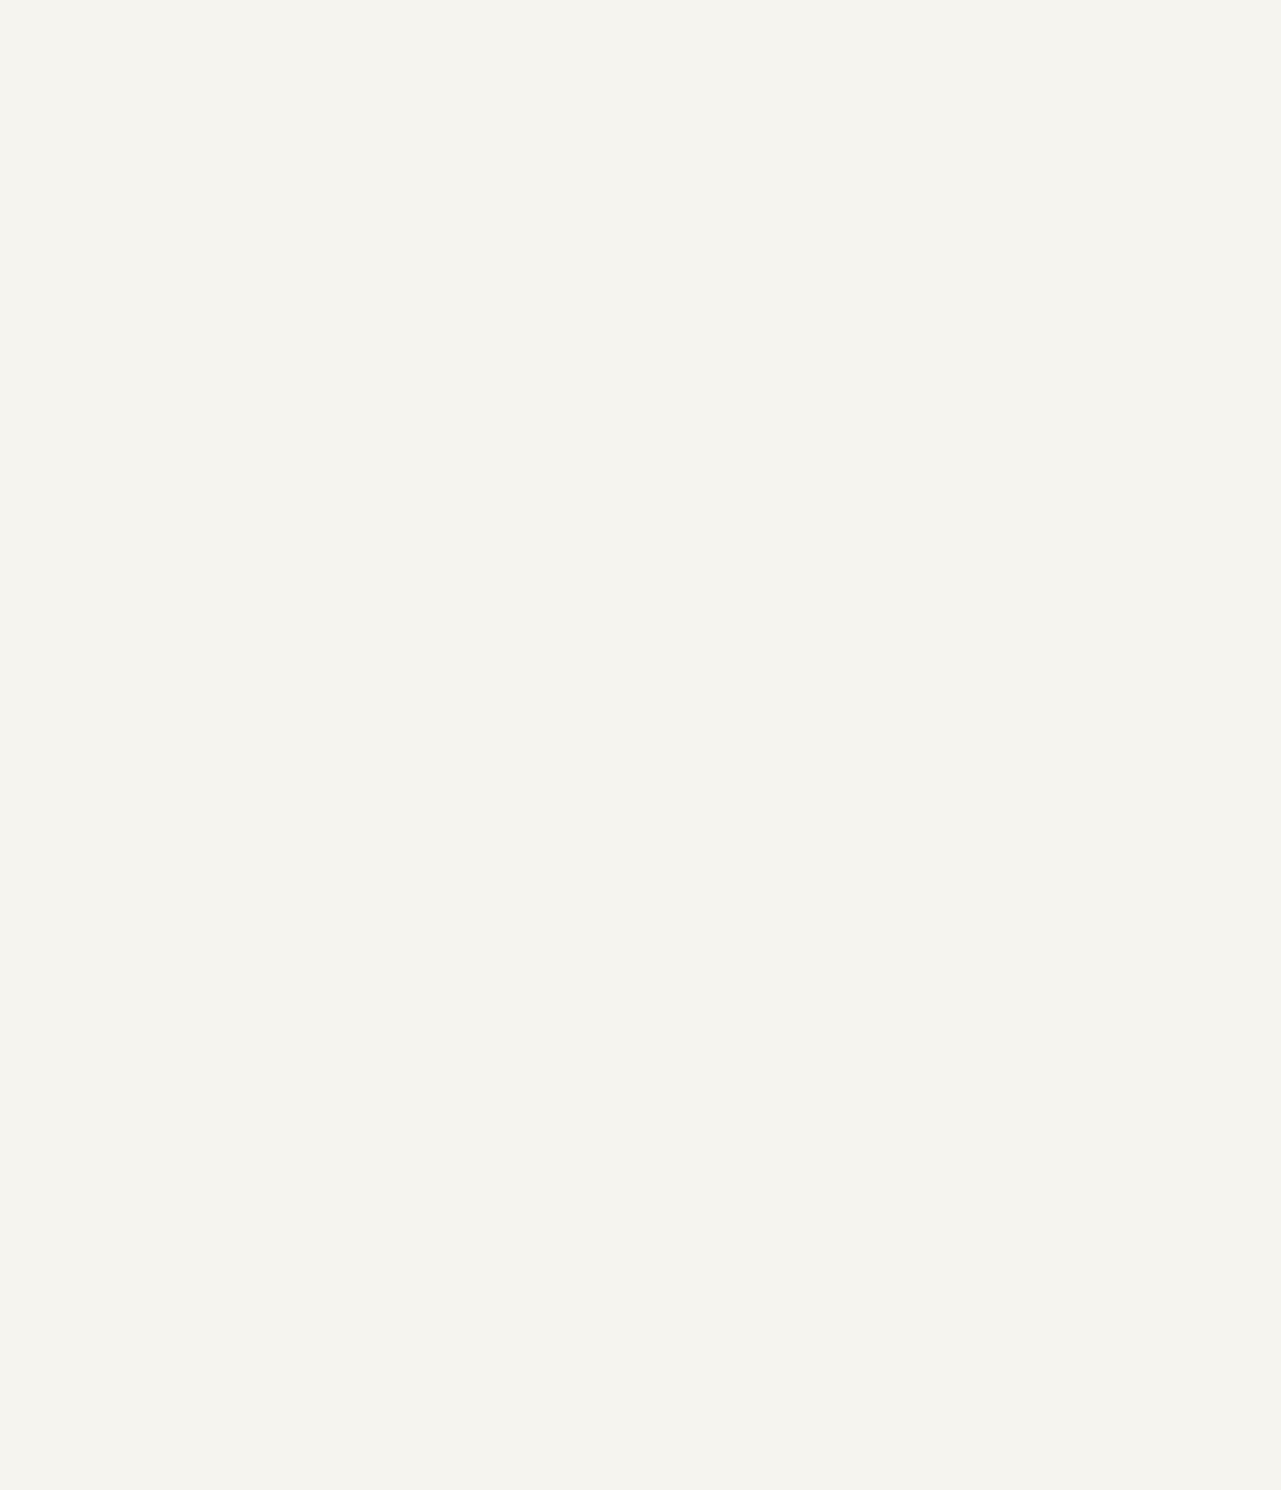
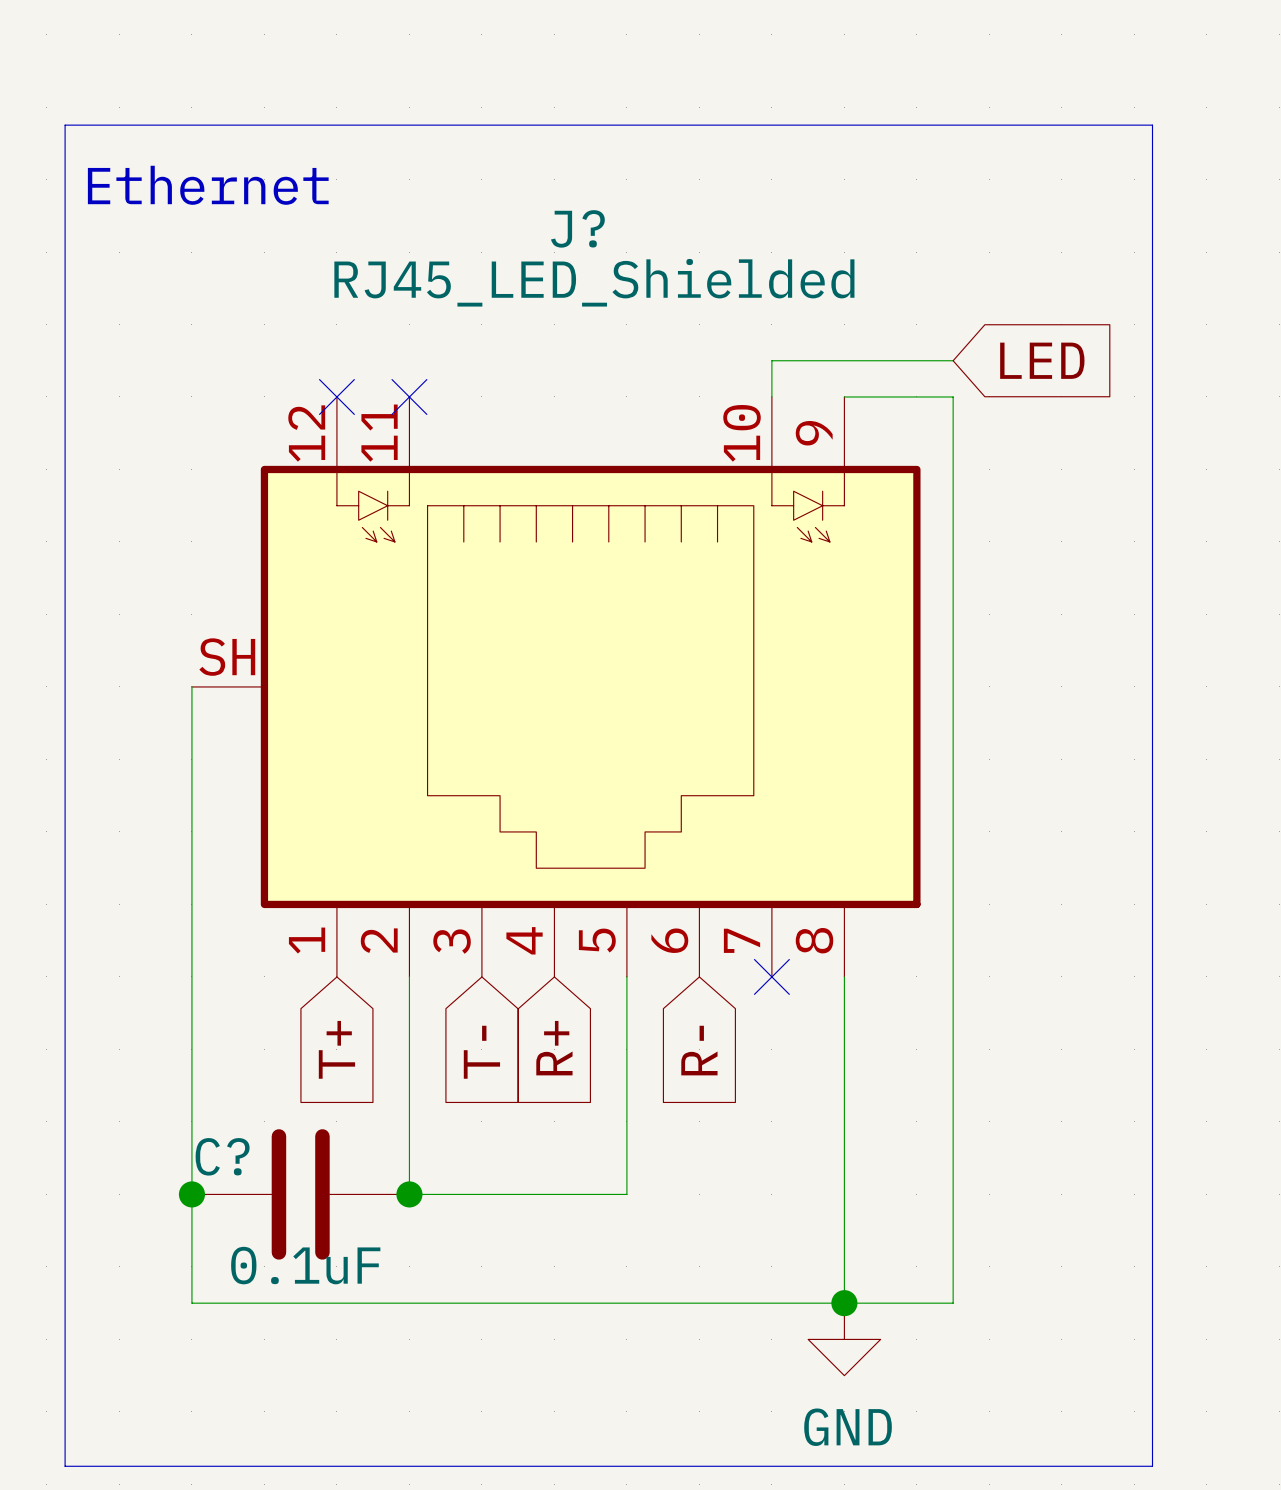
line: none -> (65, 125) (65, 1466) (1152, 1466) (1152, 125) (65, 125)
text: none -> Ethernet (208, 185)
wire: none -> (953, 360) (771, 360) (771, 396)
global label: none -> LED (1042, 360)
no-connect mark: none -> (336, 396)
no-connect mark: none -> (409, 396)
wire: none -> (844, 396) (953, 396) (953, 1303) (191, 1303) (191, 686)
J?: none -> RJ45_LED_Shielded (556, 686)
wire: none -> (409, 976) (409, 1194) (626, 1194) (626, 976)
no-connect mark: none -> (771, 976)
wire: none -> (844, 976) (844, 1303)
global label: none -> R- (699, 1050)
global label: none -> T- (481, 1052)
global label: none -> T+ (336, 1049)
global label: none -> R+ (554, 1048)
junction: none -> (191, 1194)
C?: none -> 0.1uF (300, 1194)
junction: none -> (409, 1194)
junction: none -> (844, 1303)
power symbol: none -> GND (844, 1339)

